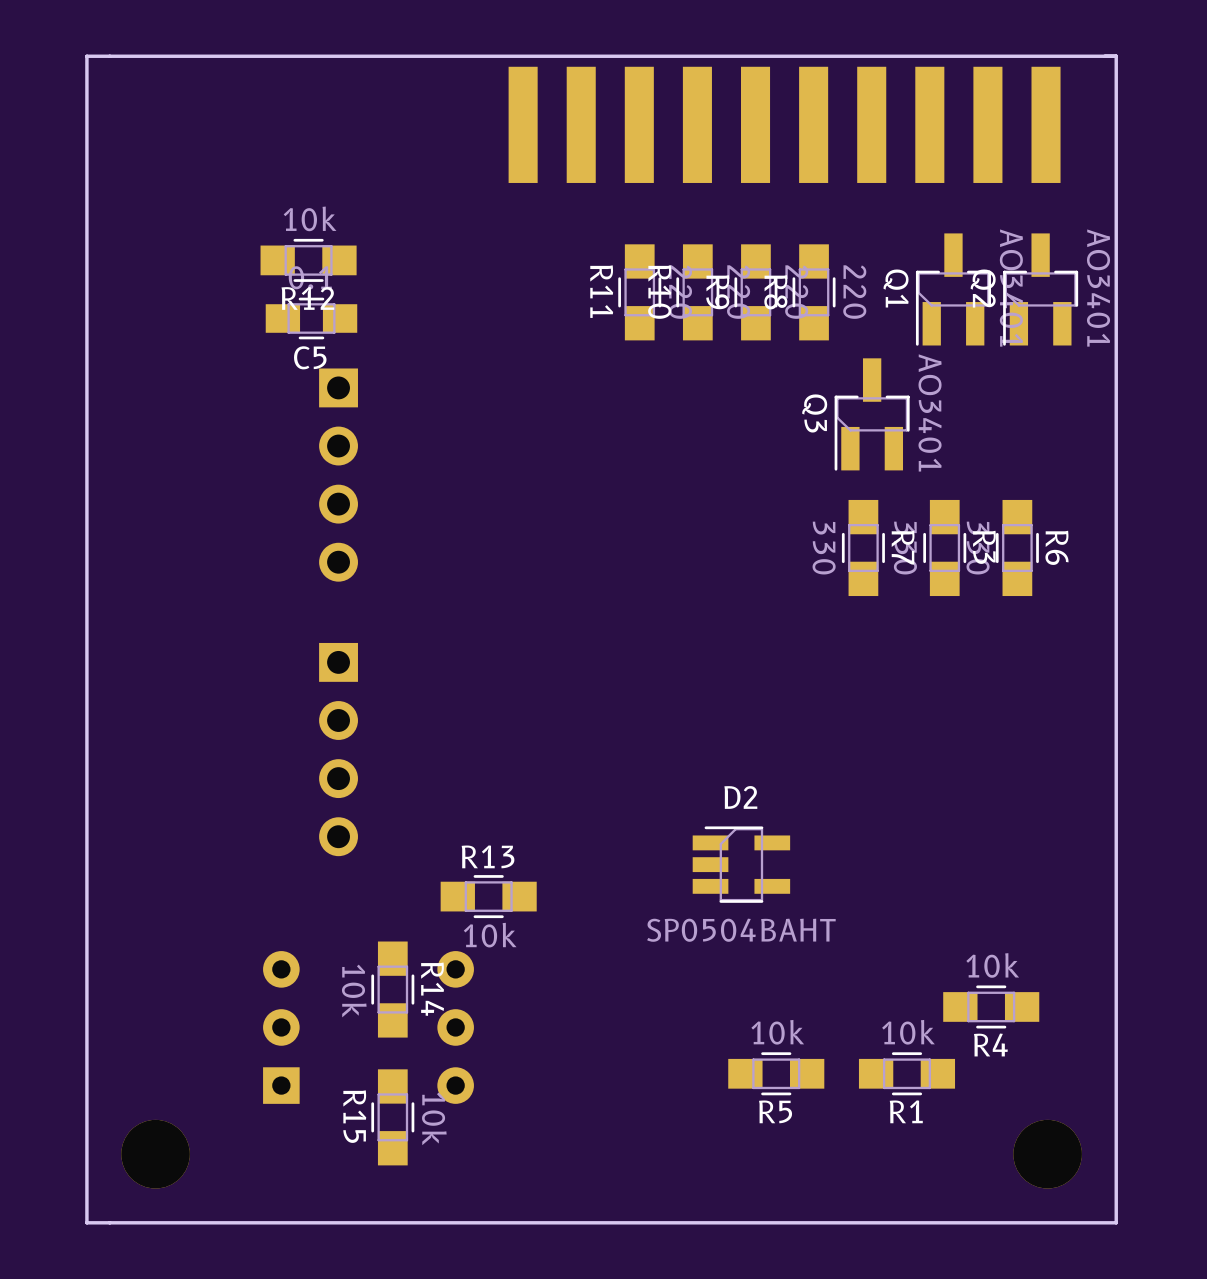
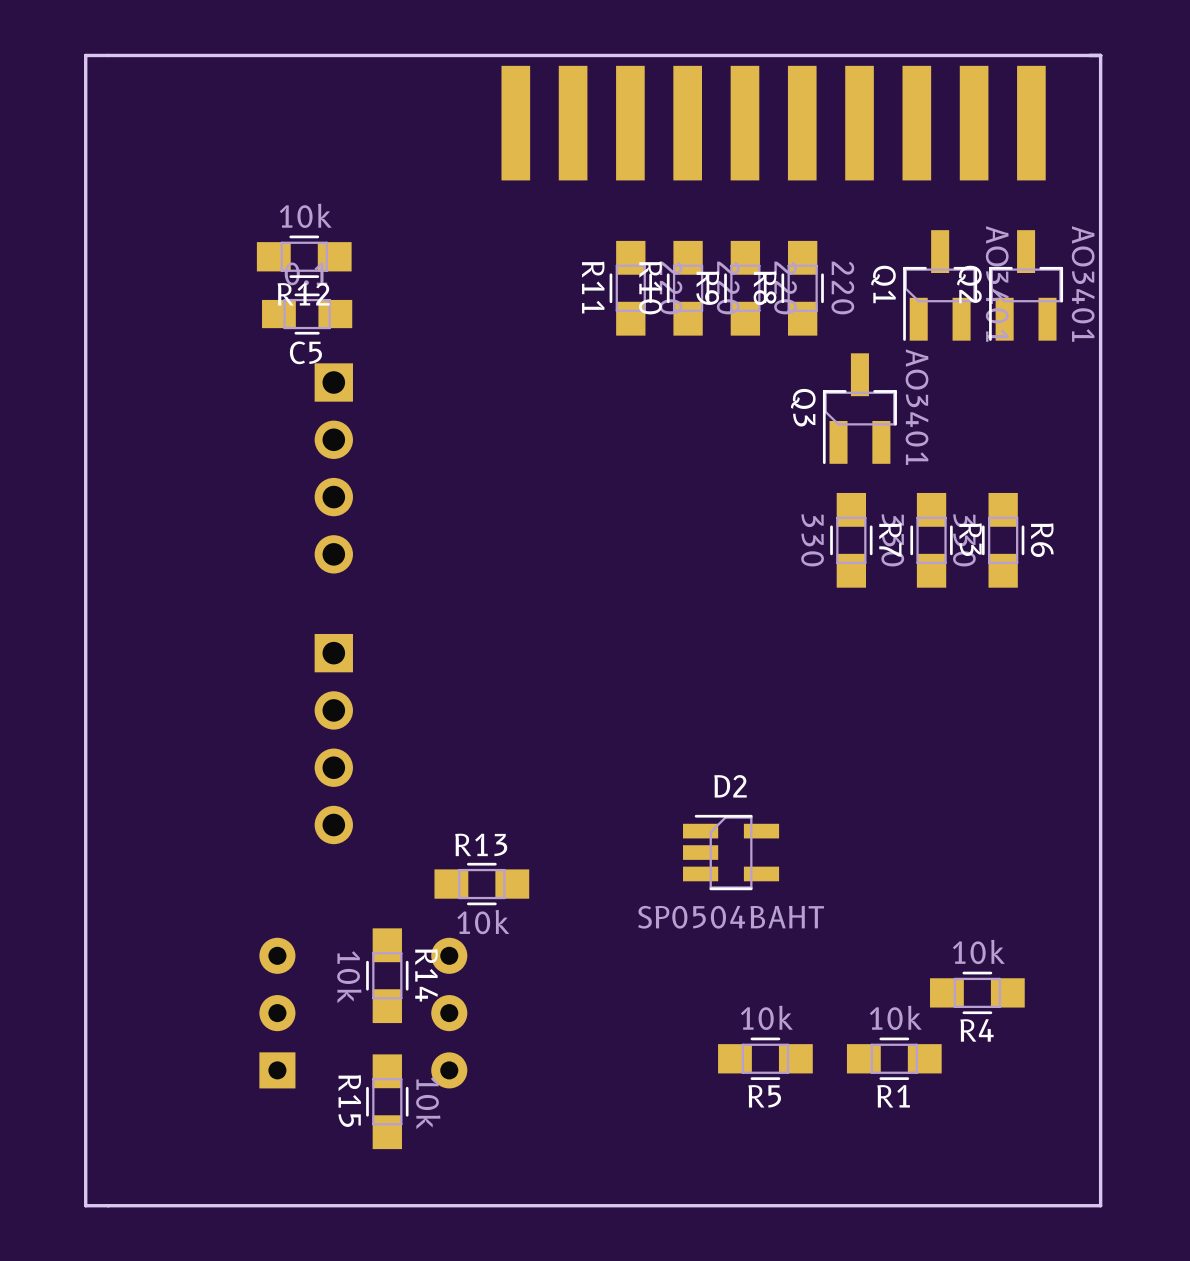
part: (155, 1154) -> none
part: (1047, 1154) -> none

